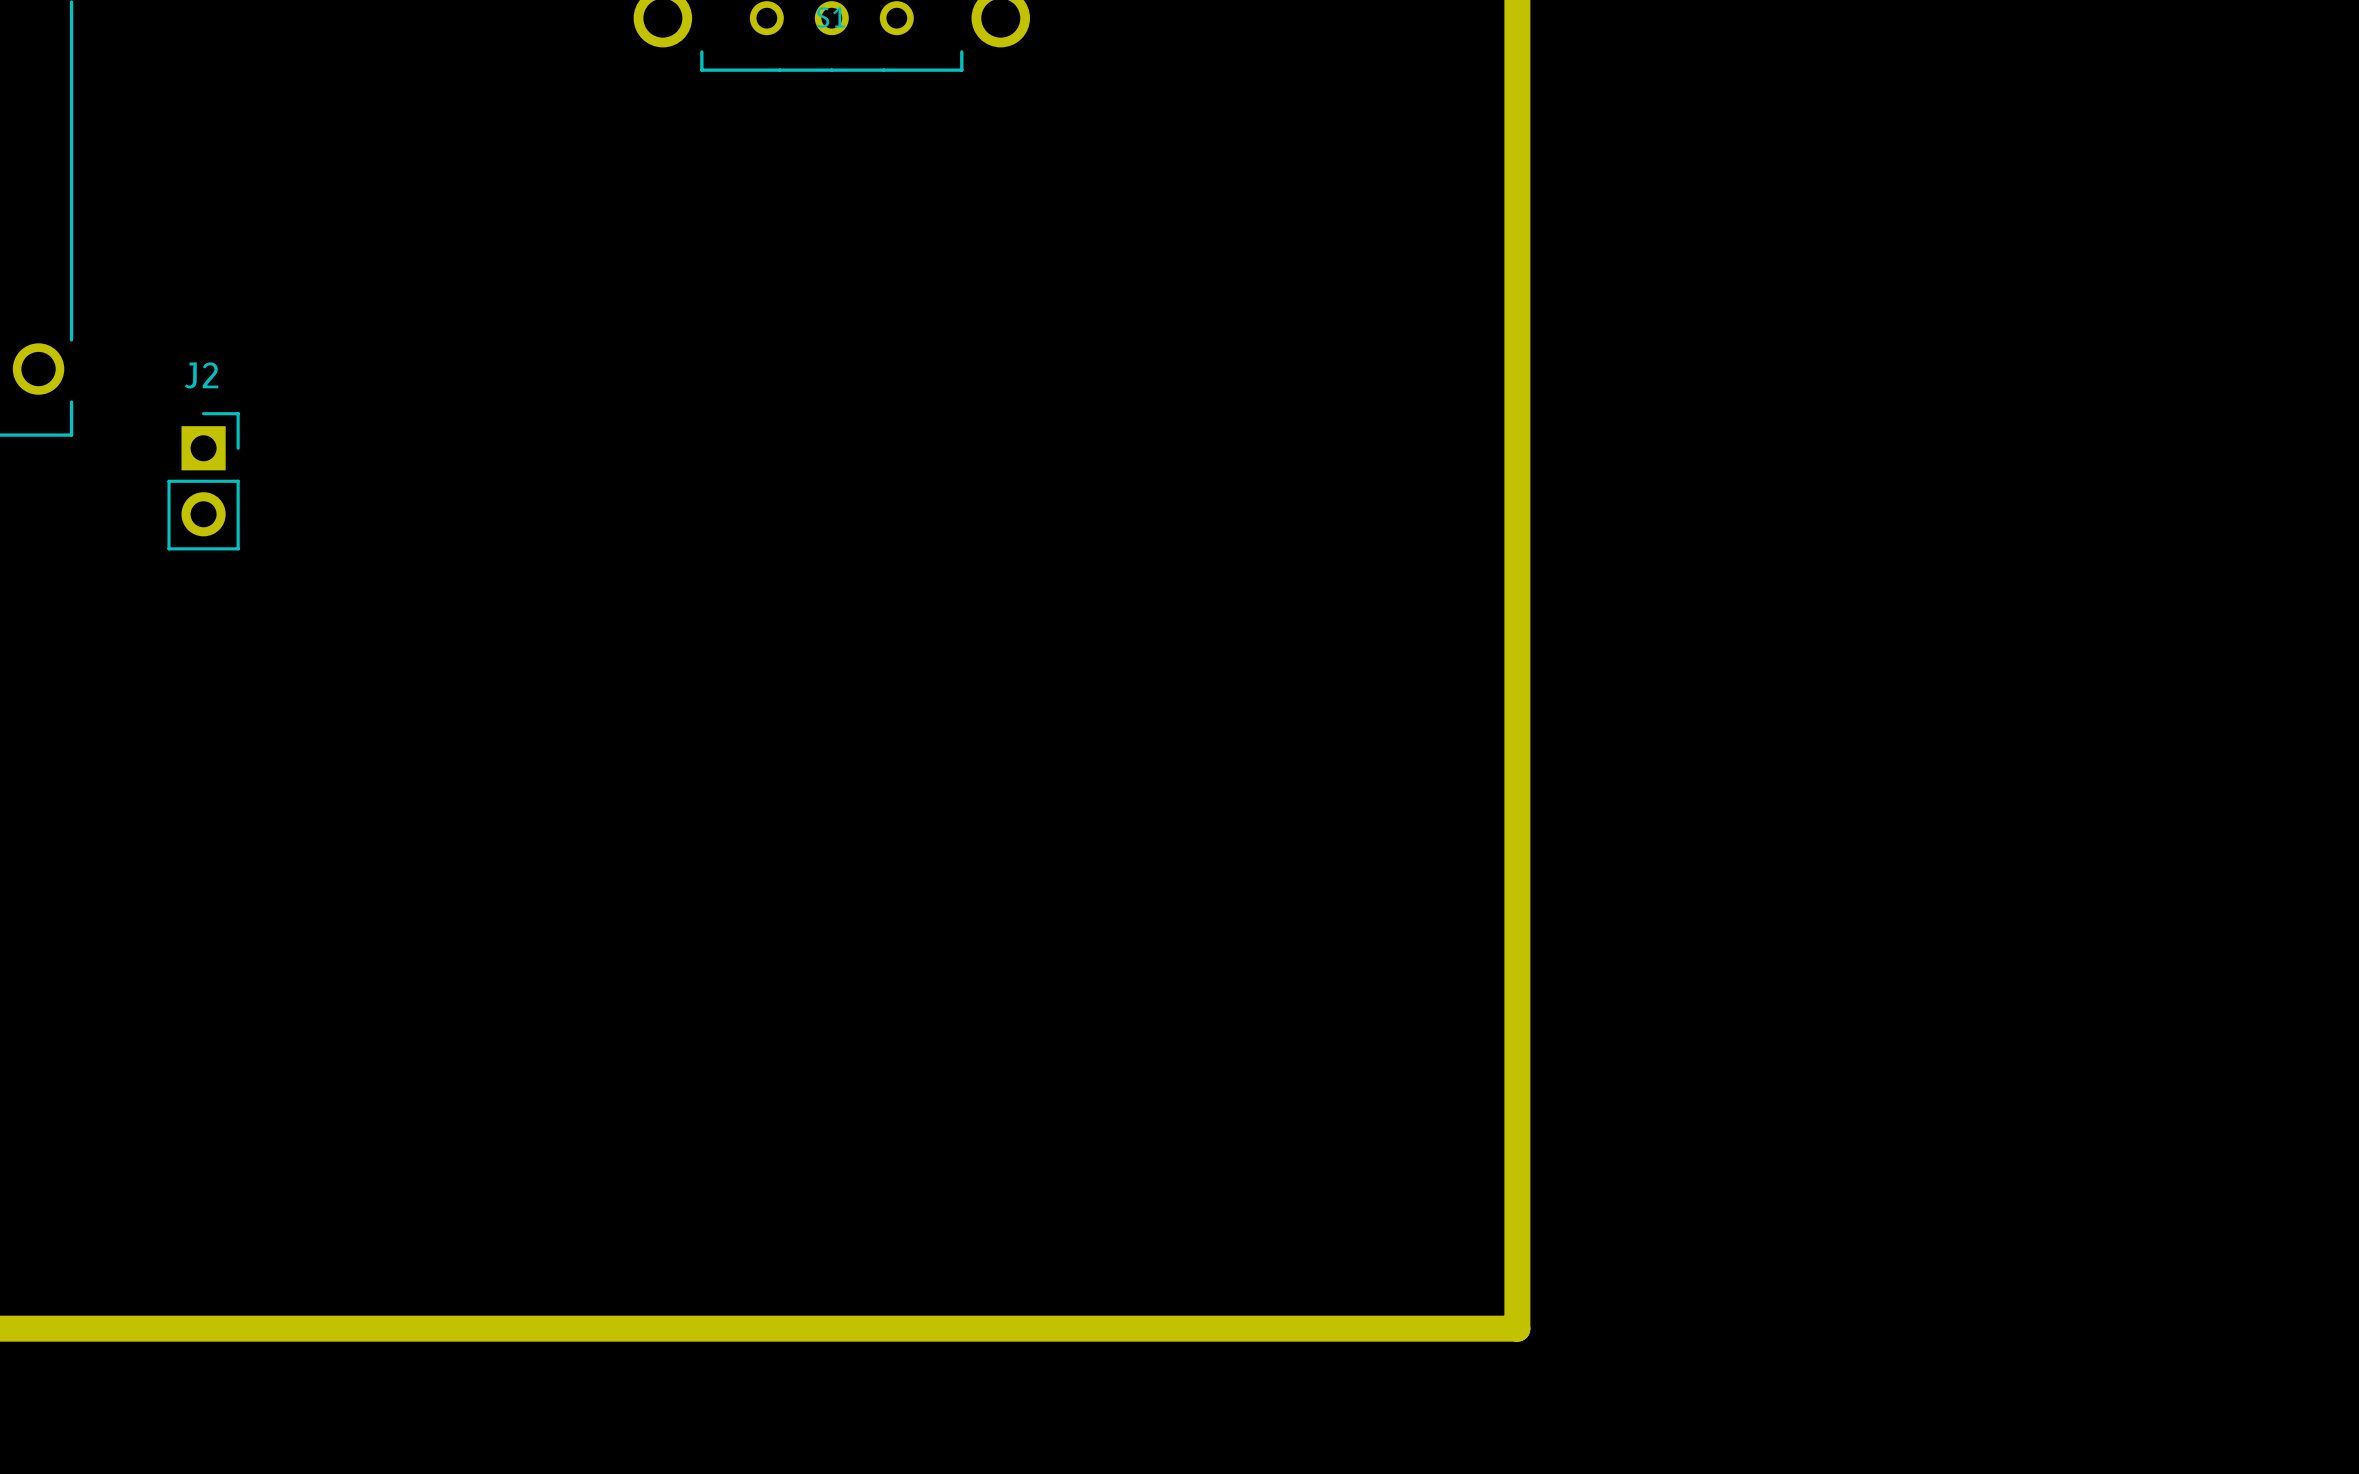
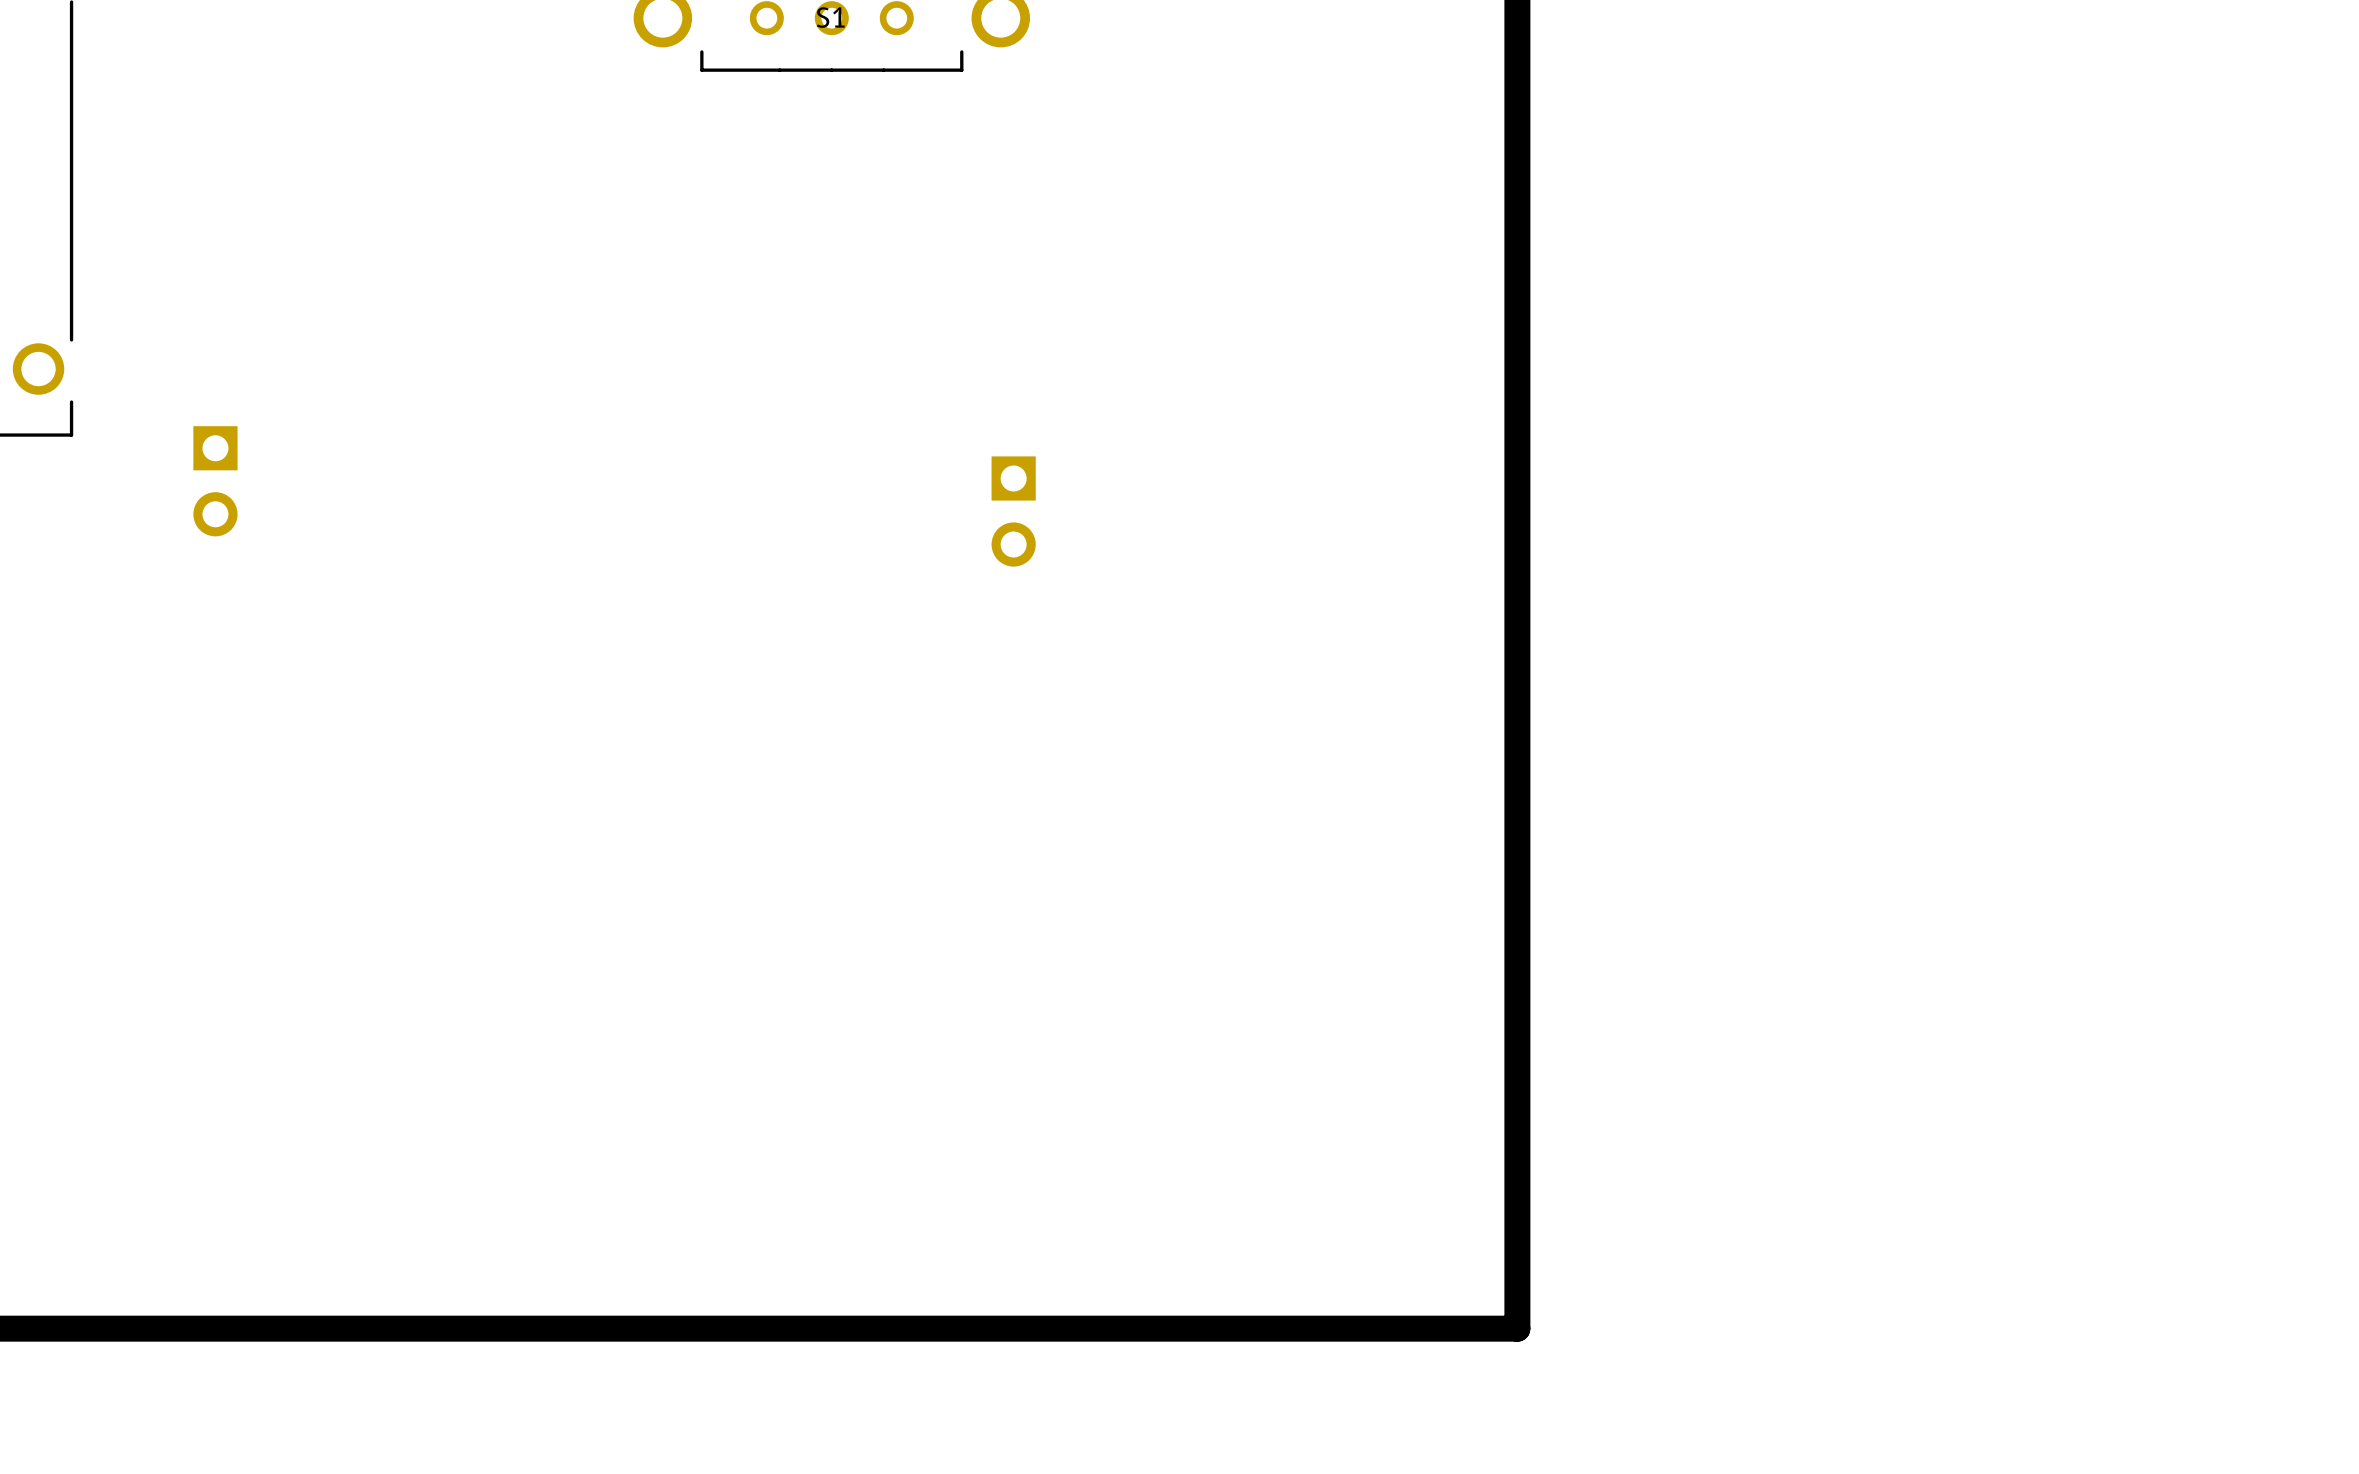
J2 side: bottom (203, 481) -> top (215, 481)
part: none -> (1013, 511)

